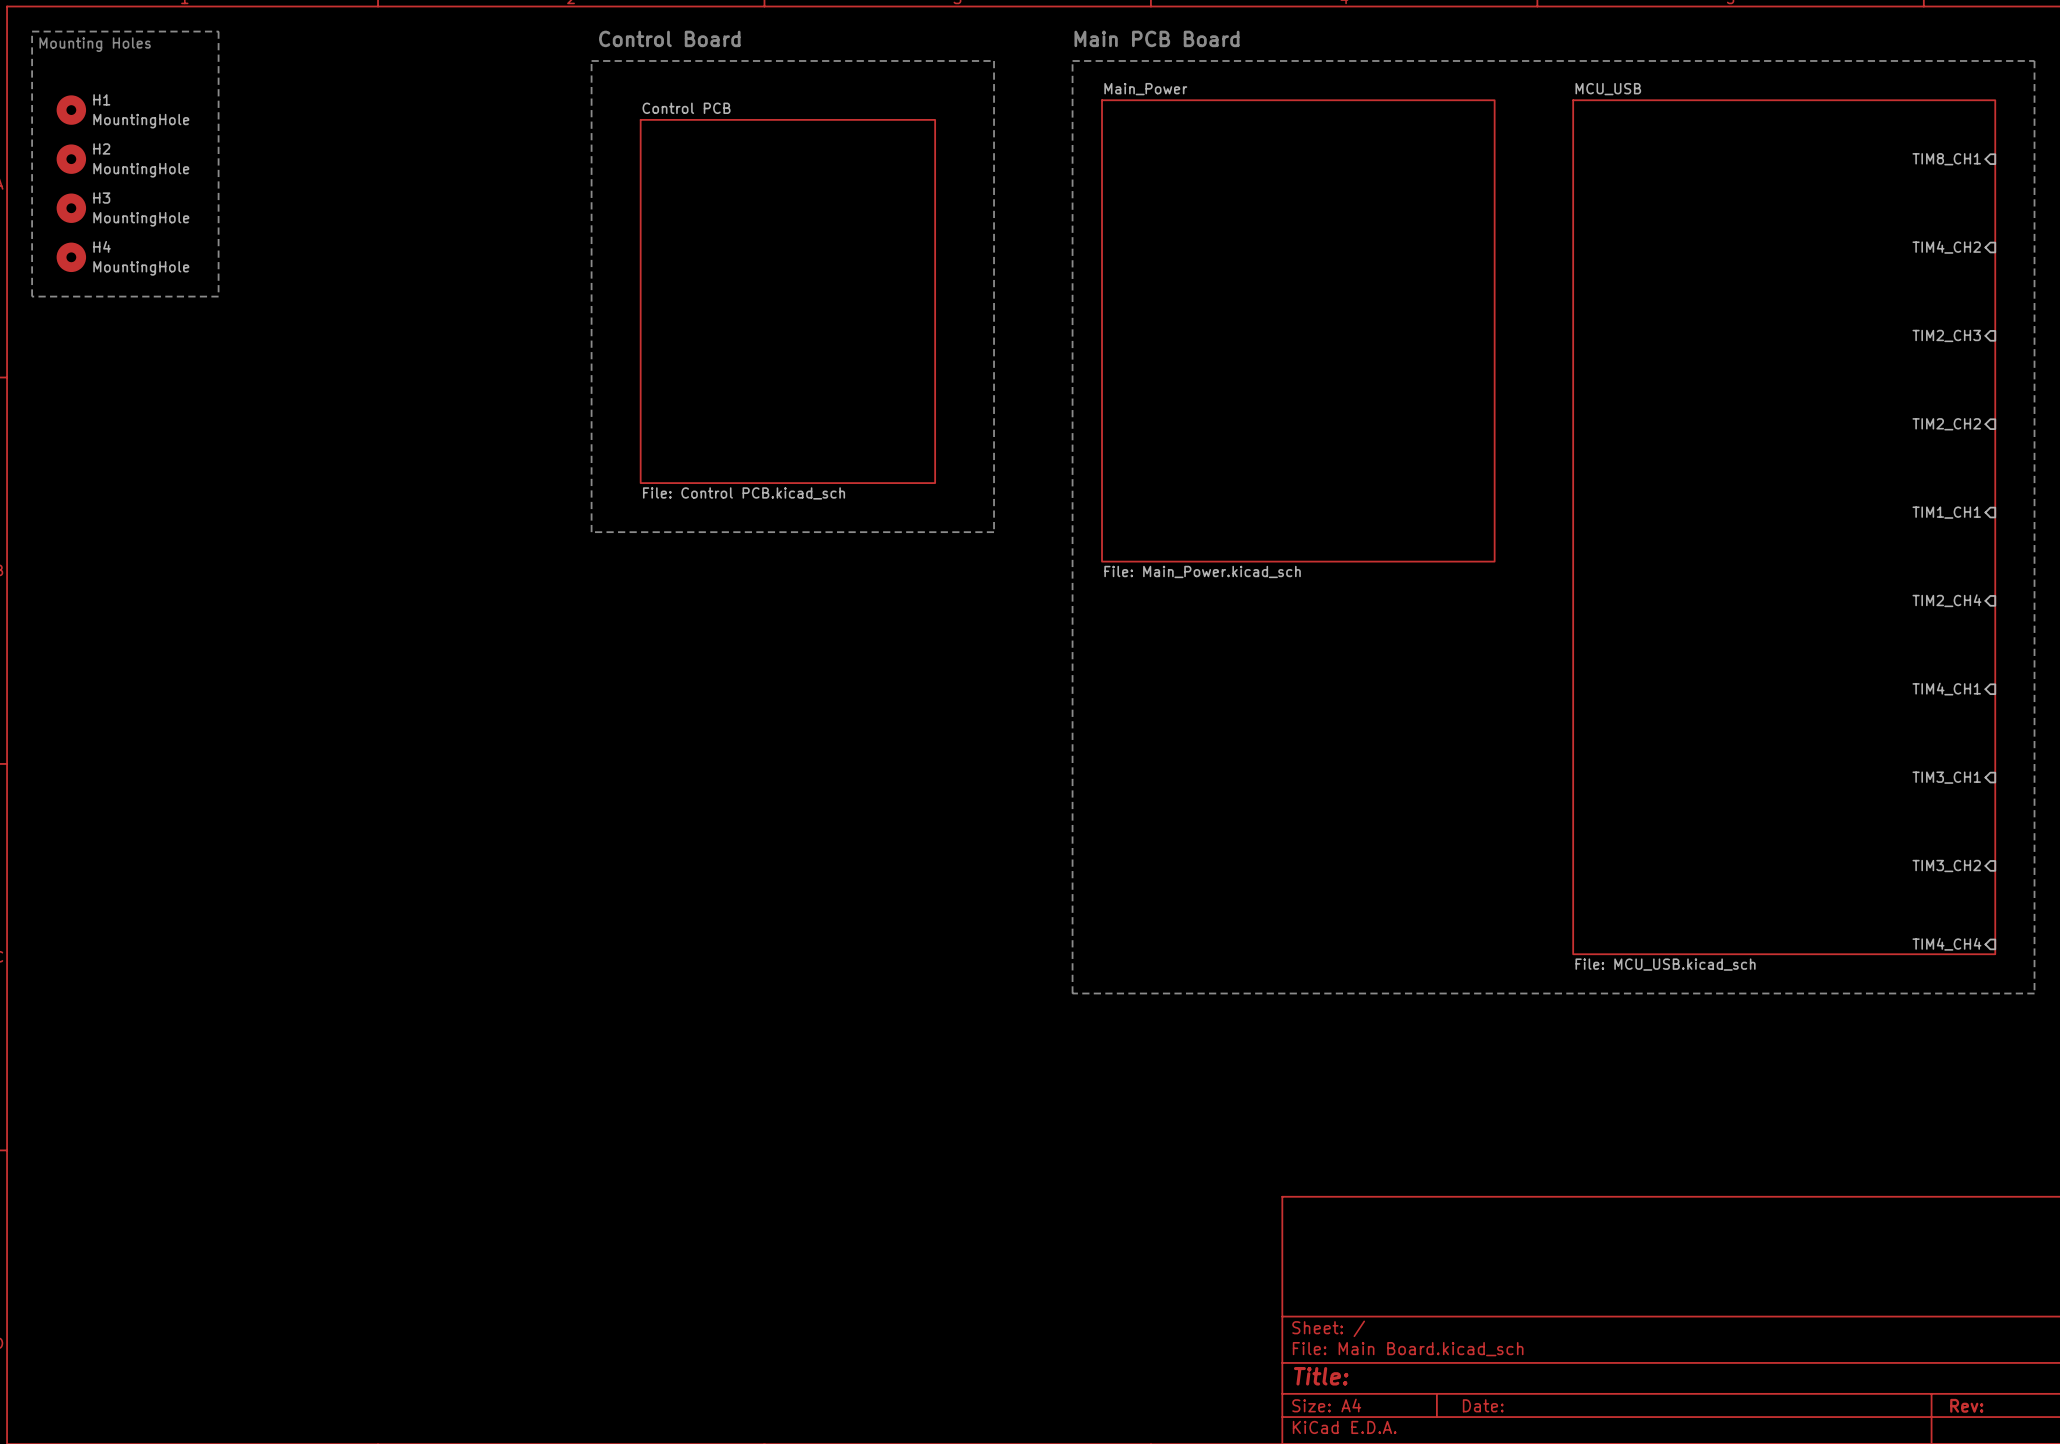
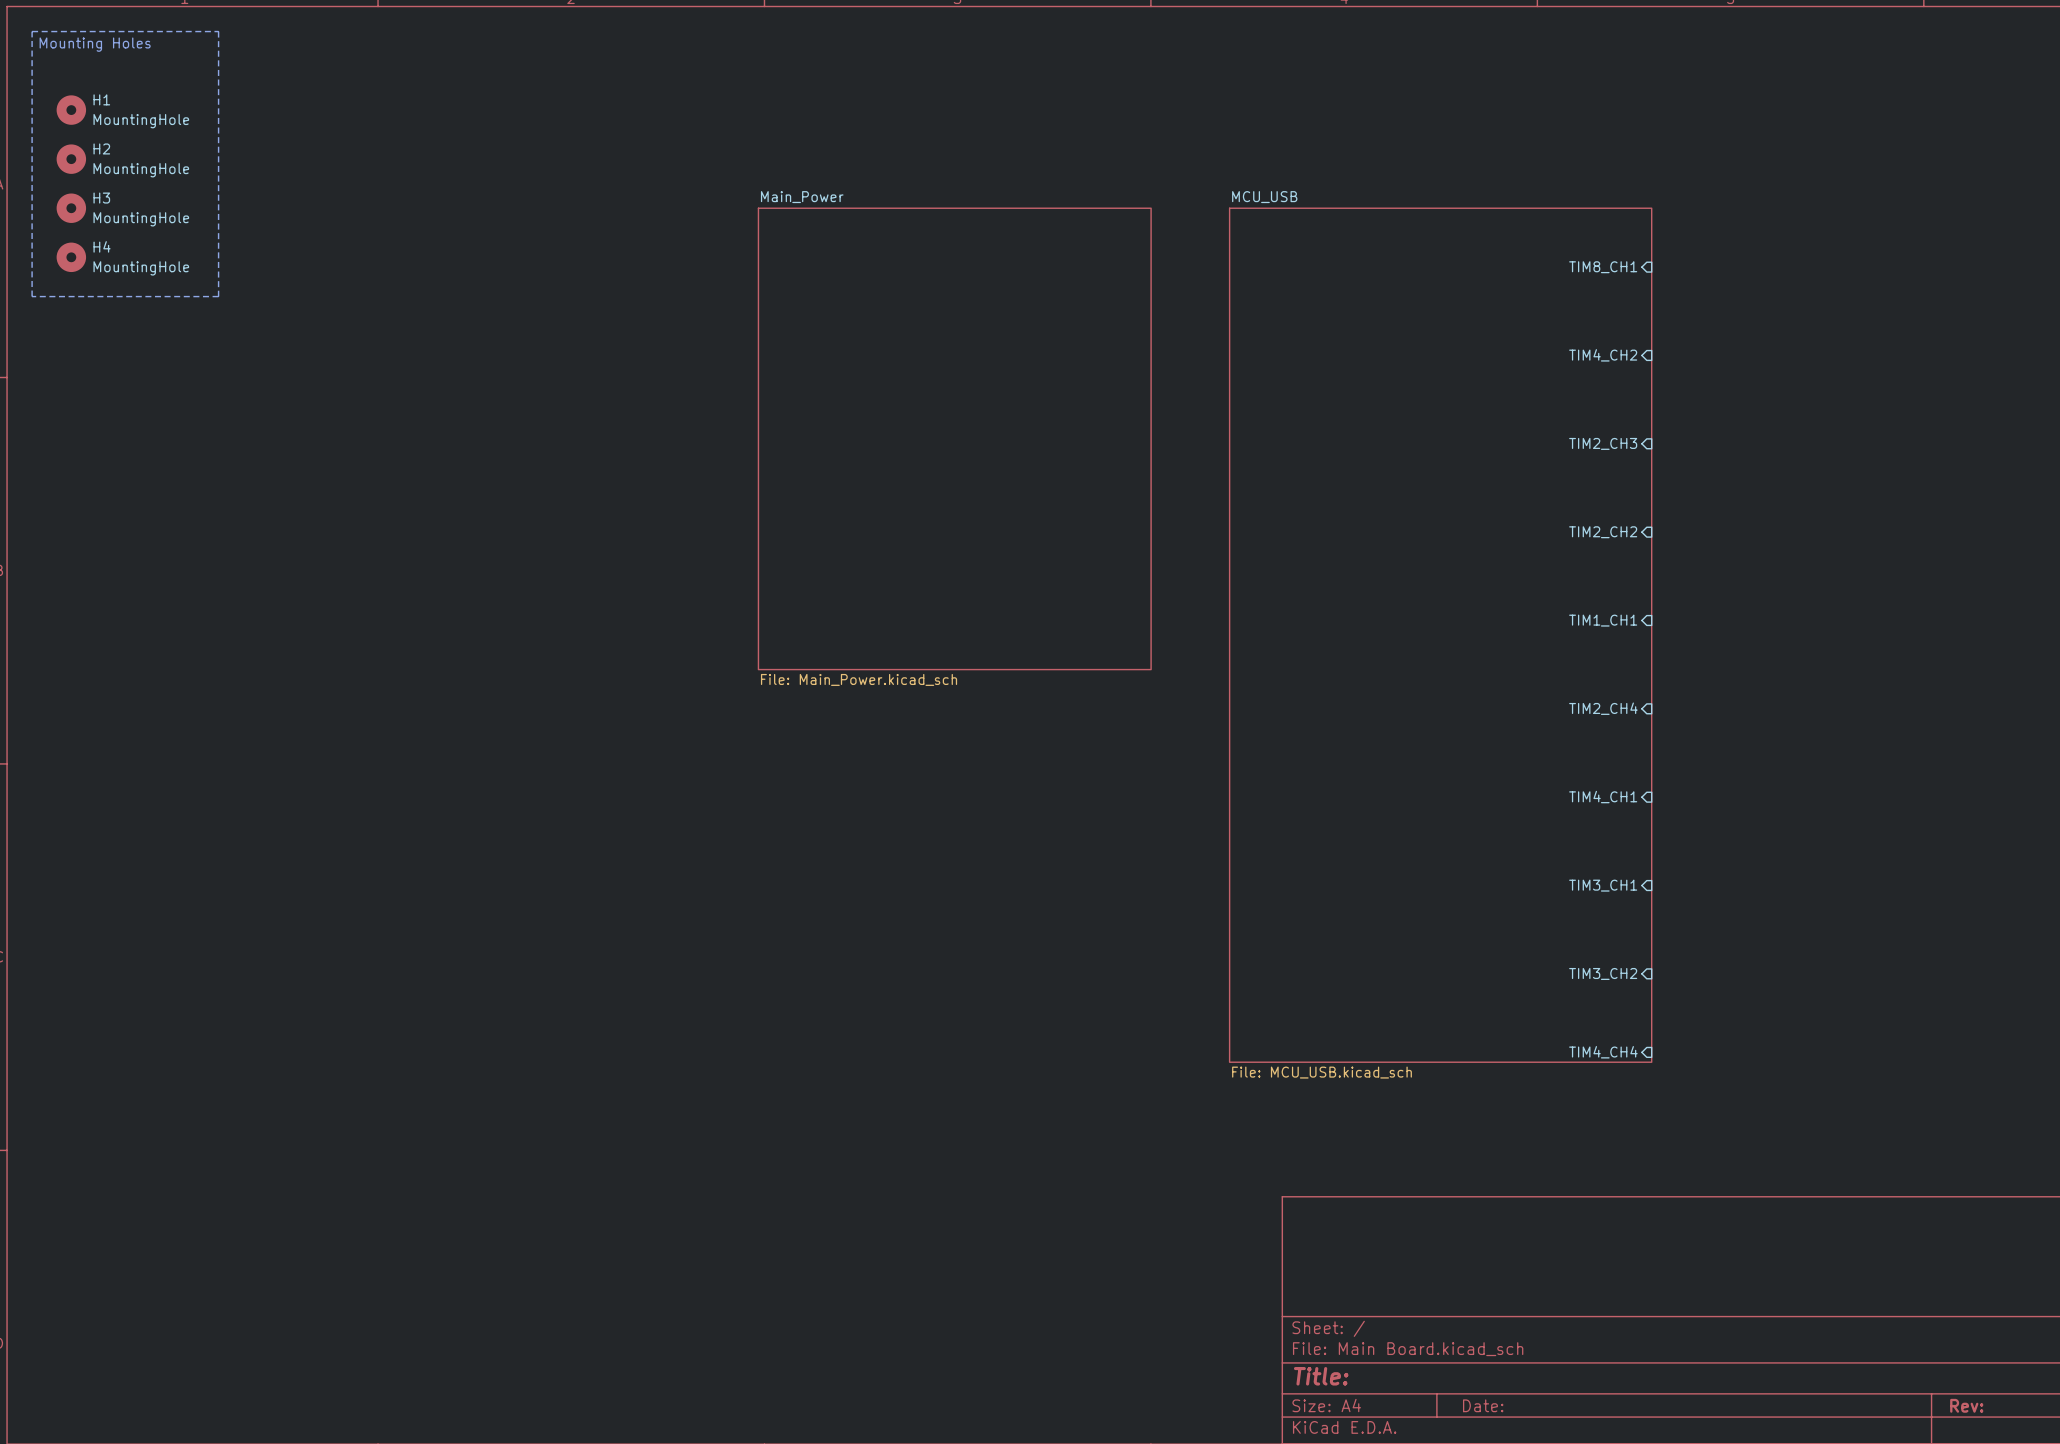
text: Control Board (669, 38) -> none
text: Main PCB Board (1156, 38) -> none
line: (591, 60) (994, 60) (994, 532) (591, 532) (591, 60) -> none
line: (1072, 60) (2034, 60) (2034, 993) (1072, 993) (1072, 60) -> none
sheet pin: TIM8_CH1 (1946, 159) -> none
sheet pin: TIM4_CH2 (1946, 247) -> none
sheet pin: none -> TIM8_CH1 (1603, 267)
sheet Control PCB: File: Control PCB.kicad_sch (787, 301) -> none
sheet Main_Power: File: Main_Power.kicad_sch (1298, 330) -> none
sheet pin: TIM2_CH3 (1946, 335) -> none
sheet pin: none -> TIM4_CH2 (1603, 355)
sheet pin: TIM2_CH2 (1946, 424) -> none
sheet Main_Power: none -> File: Main_Power.kicad_sch (954, 438)
sheet pin: none -> TIM2_CH3 (1603, 443)
sheet pin: TIM1_CH1 (1946, 512) -> none
sheet MCU_USB: File: MCU_USB.kicad_sch (1784, 527) -> none
sheet pin: none -> TIM2_CH2 (1603, 532)
sheet pin: TIM2_CH4 (1946, 600) -> none
sheet pin: none -> TIM1_CH1 (1603, 620)
sheet MCU_USB: none -> File: MCU_USB.kicad_sch (1440, 635)
sheet pin: TIM4_CH1 (1946, 689) -> none
sheet pin: none -> TIM2_CH4 (1603, 708)
sheet pin: TIM3_CH1 (1946, 777) -> none
sheet pin: none -> TIM4_CH1 (1603, 797)
sheet pin: TIM3_CH2 (1946, 865) -> none
sheet pin: none -> TIM3_CH1 (1603, 885)
sheet pin: TIM4_CH4 (1946, 944) -> none
sheet pin: none -> TIM3_CH2 (1603, 973)
sheet pin: none -> TIM4_CH4 (1603, 1052)

